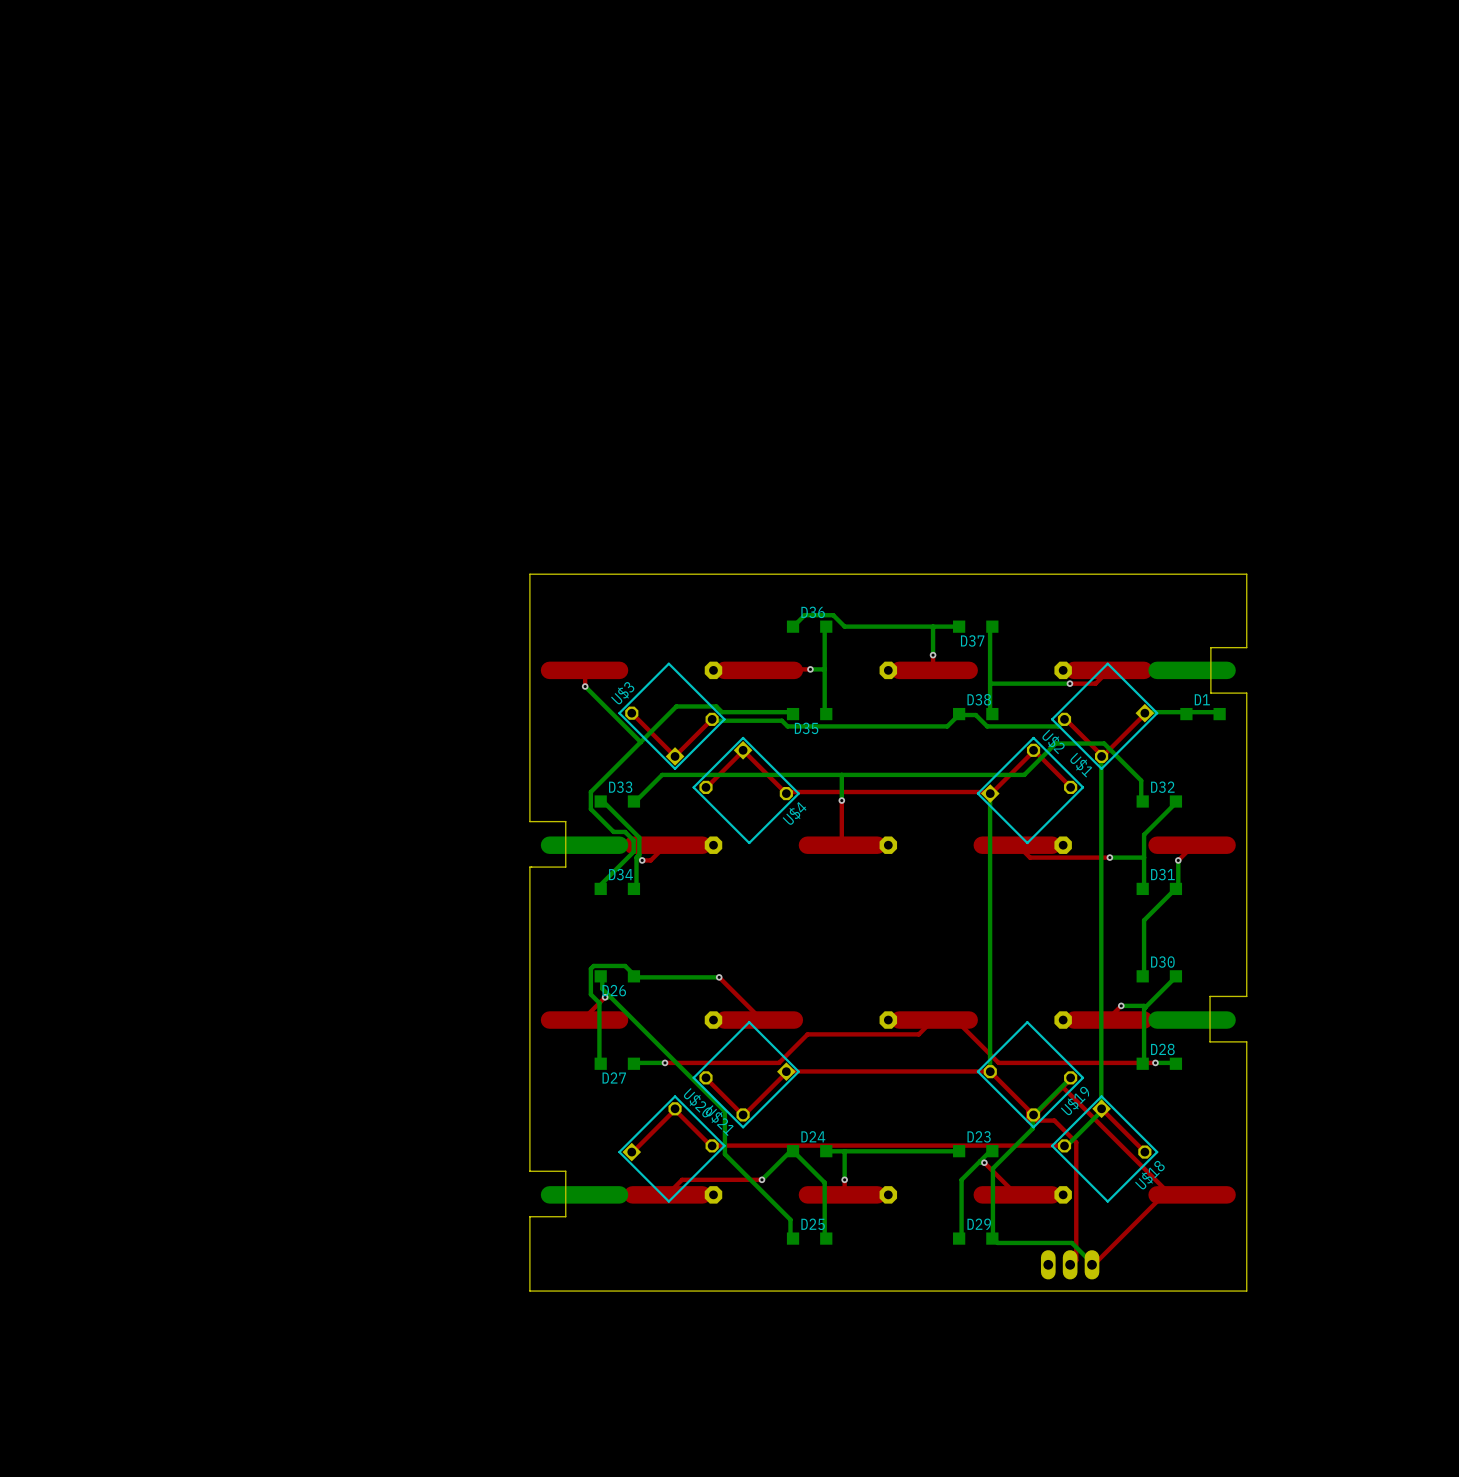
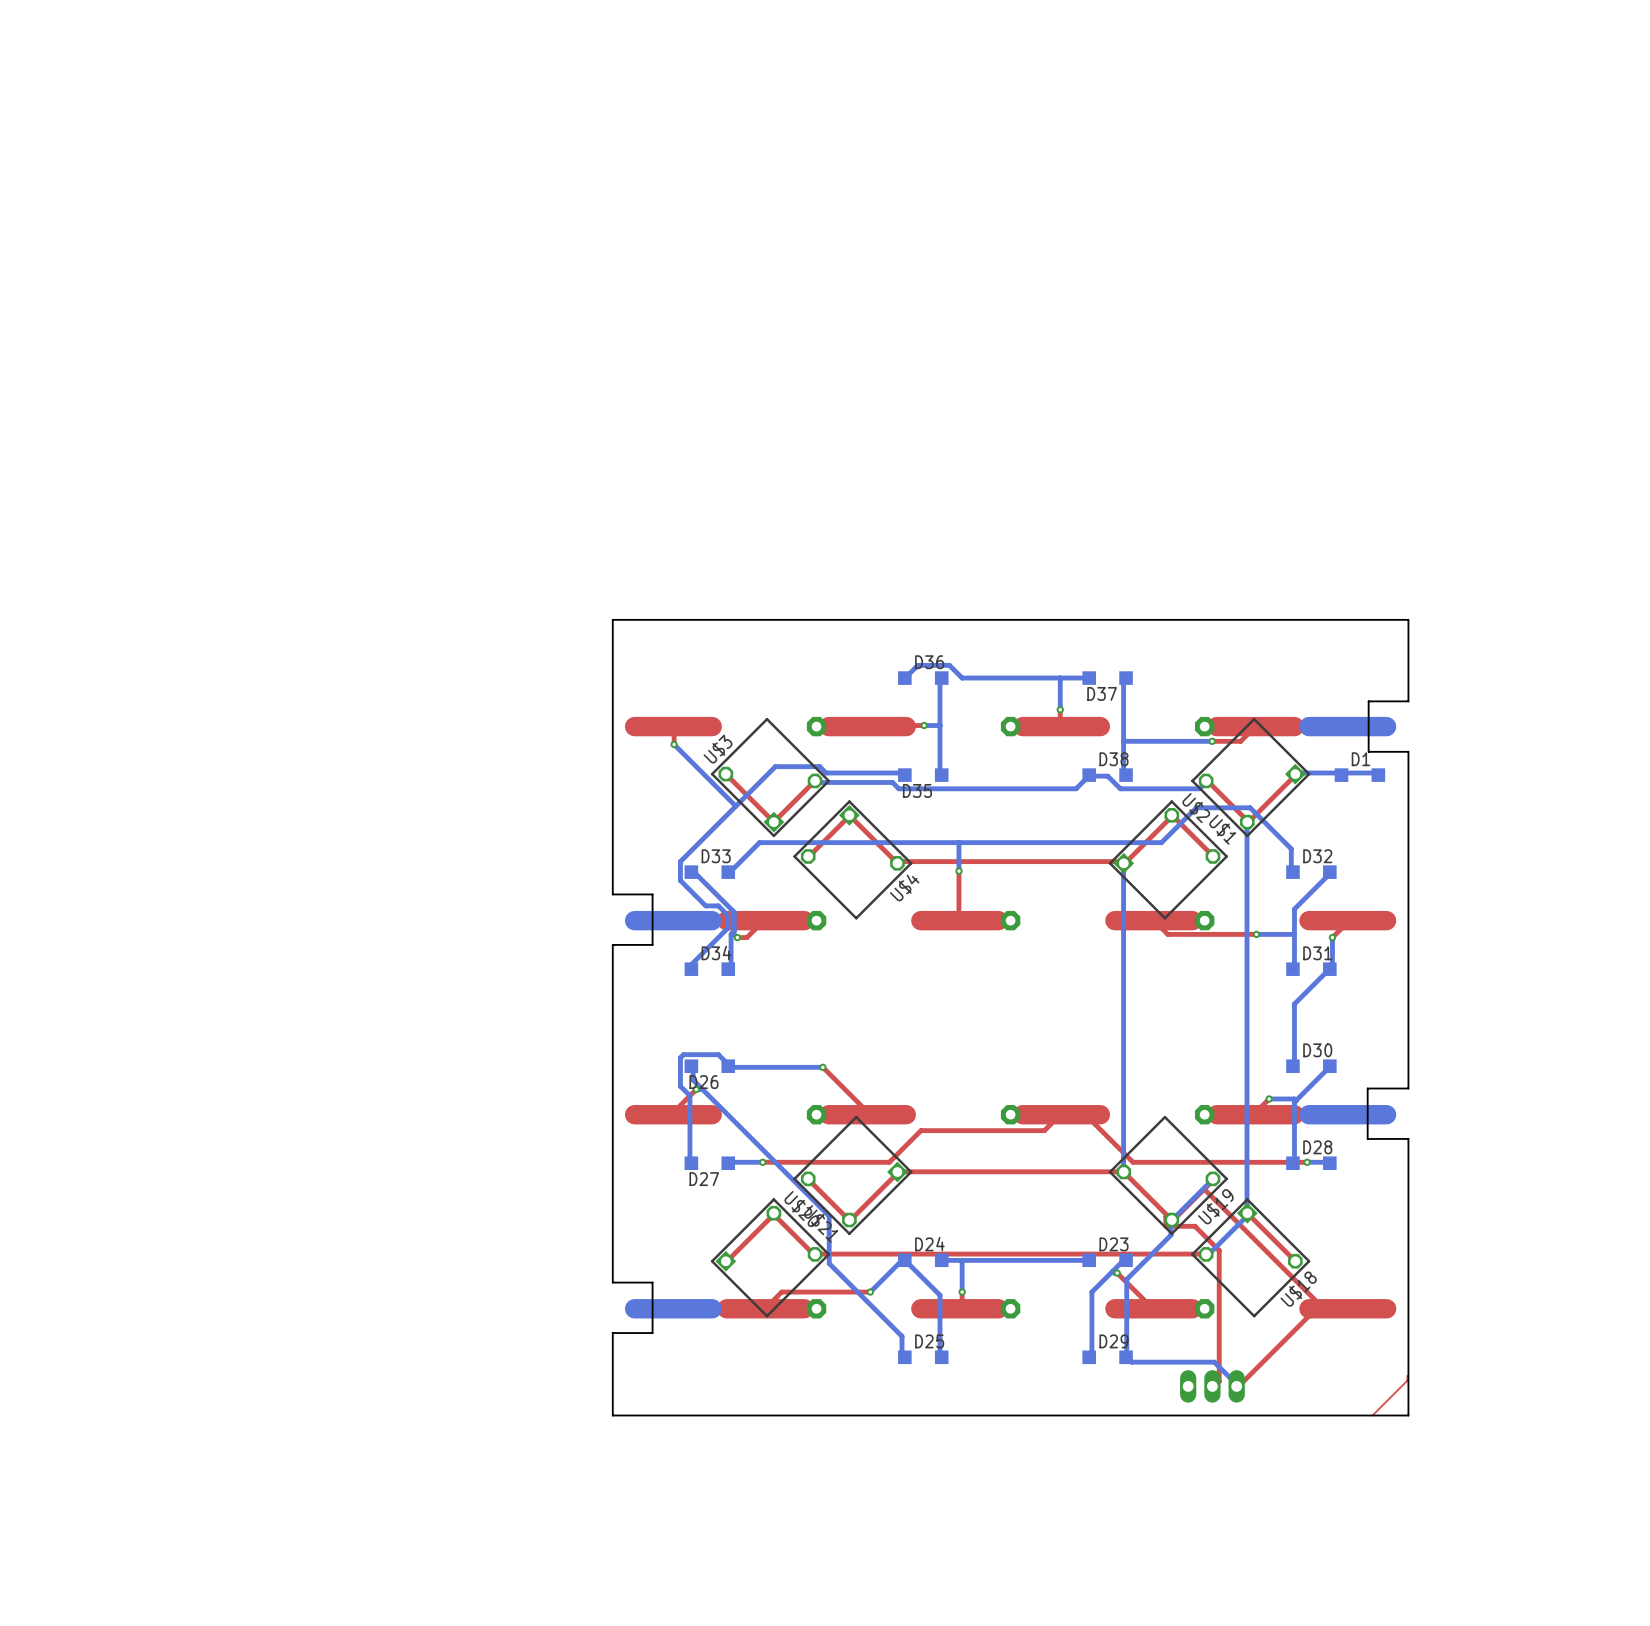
top track: none -> (1407, 1375) (1407, 1380) (1372, 1415)

